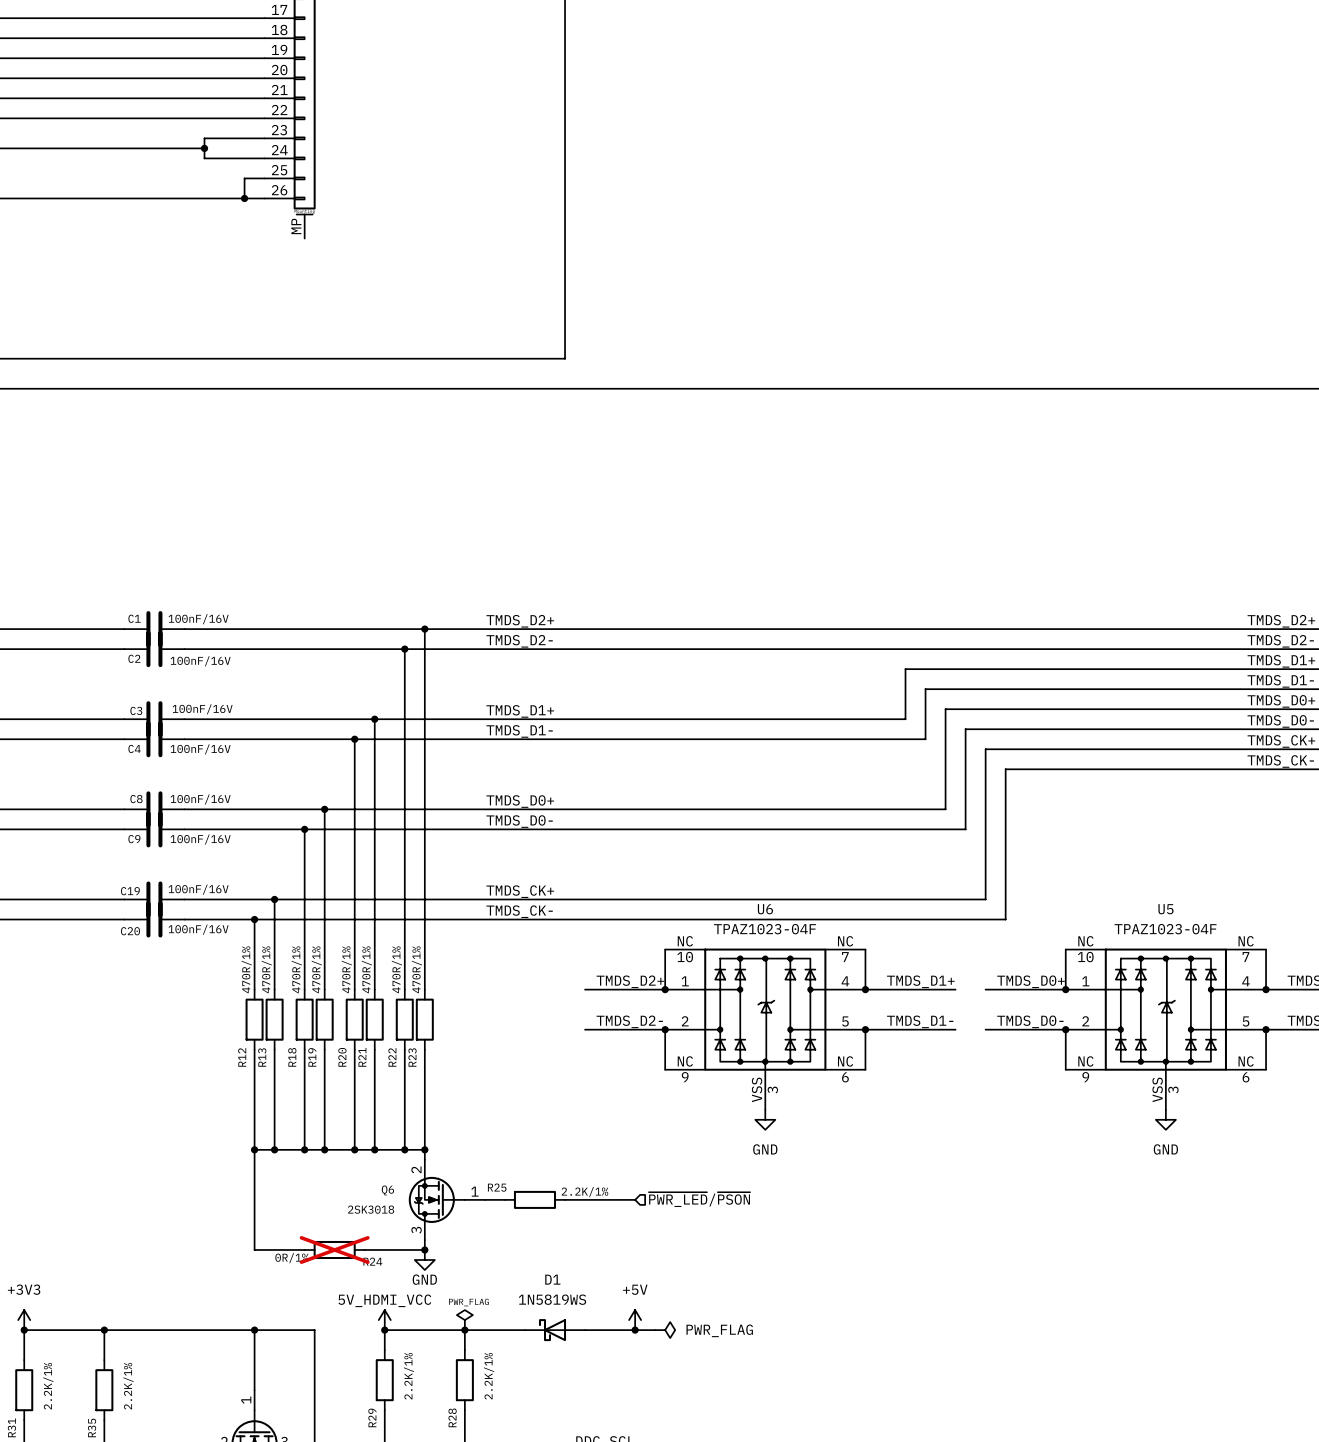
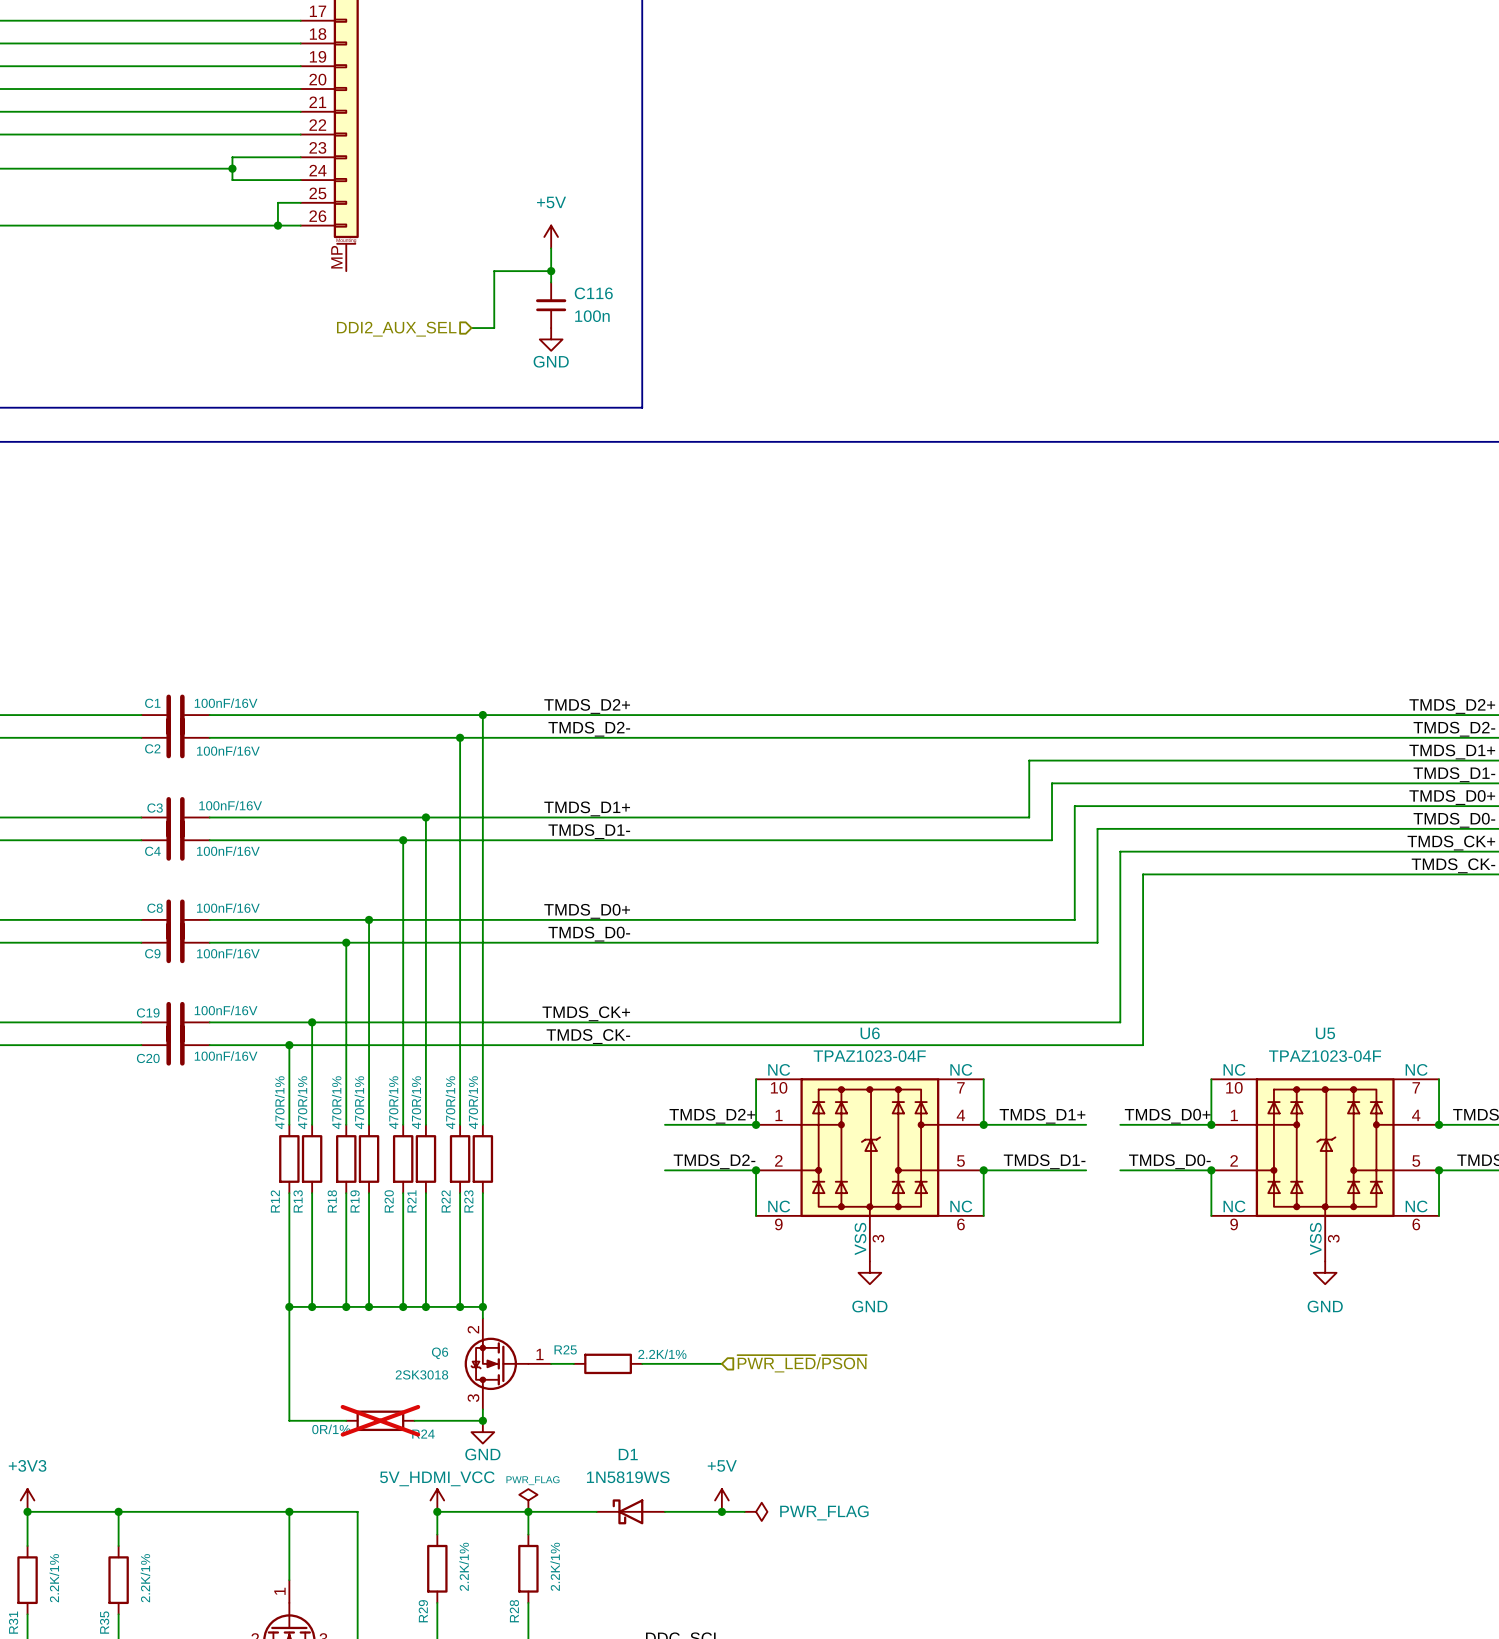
power symbol: none -> +5V (551, 236)
wire: none -> (551, 248) (551, 282)
wire: none -> (551, 271) (494, 271) (494, 328) (471, 328)
junction: none -> (551, 271)
C116: none -> (551, 305)
hierarchical label: none -> DDI2_AUX_SEL (396, 329)
power symbol: none -> GND (551, 339)

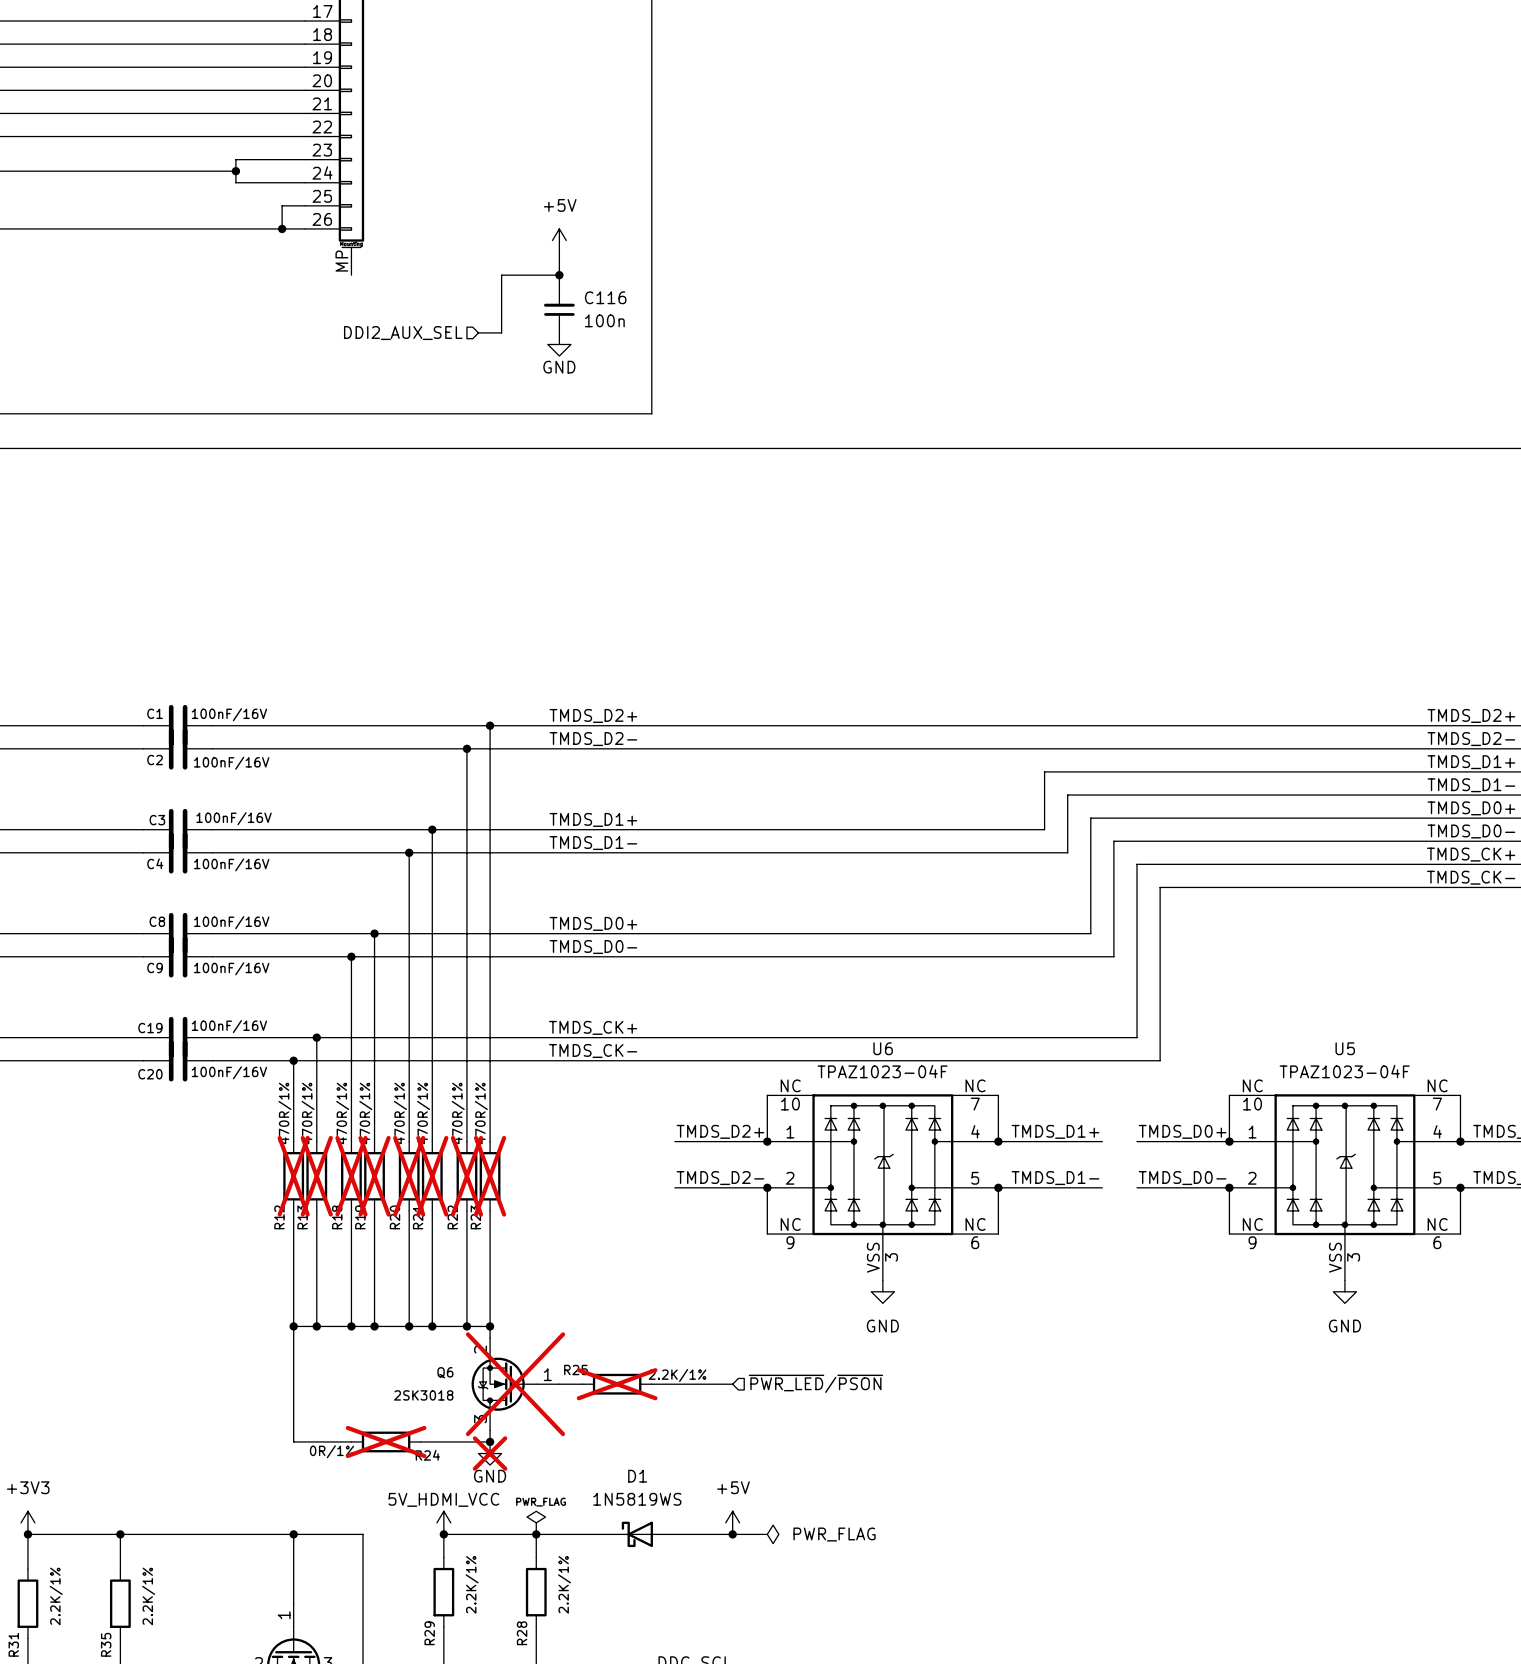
R12 do-not-place cross: none -> (293, 1176)
R13 do-not-place cross: none -> (316, 1176)
R18 do-not-place cross: none -> (351, 1176)
R19 do-not-place cross: none -> (374, 1176)
R20 do-not-place cross: none -> (409, 1176)
R21 do-not-place cross: none -> (432, 1176)
R22 do-not-place cross: none -> (466, 1176)
R23 do-not-place cross: none -> (490, 1176)
Q6 do-not-place cross: none -> (515, 1384)
R25 do-not-place cross: none -> (617, 1384)
power symbol do-not-place cross: none -> (490, 1453)

